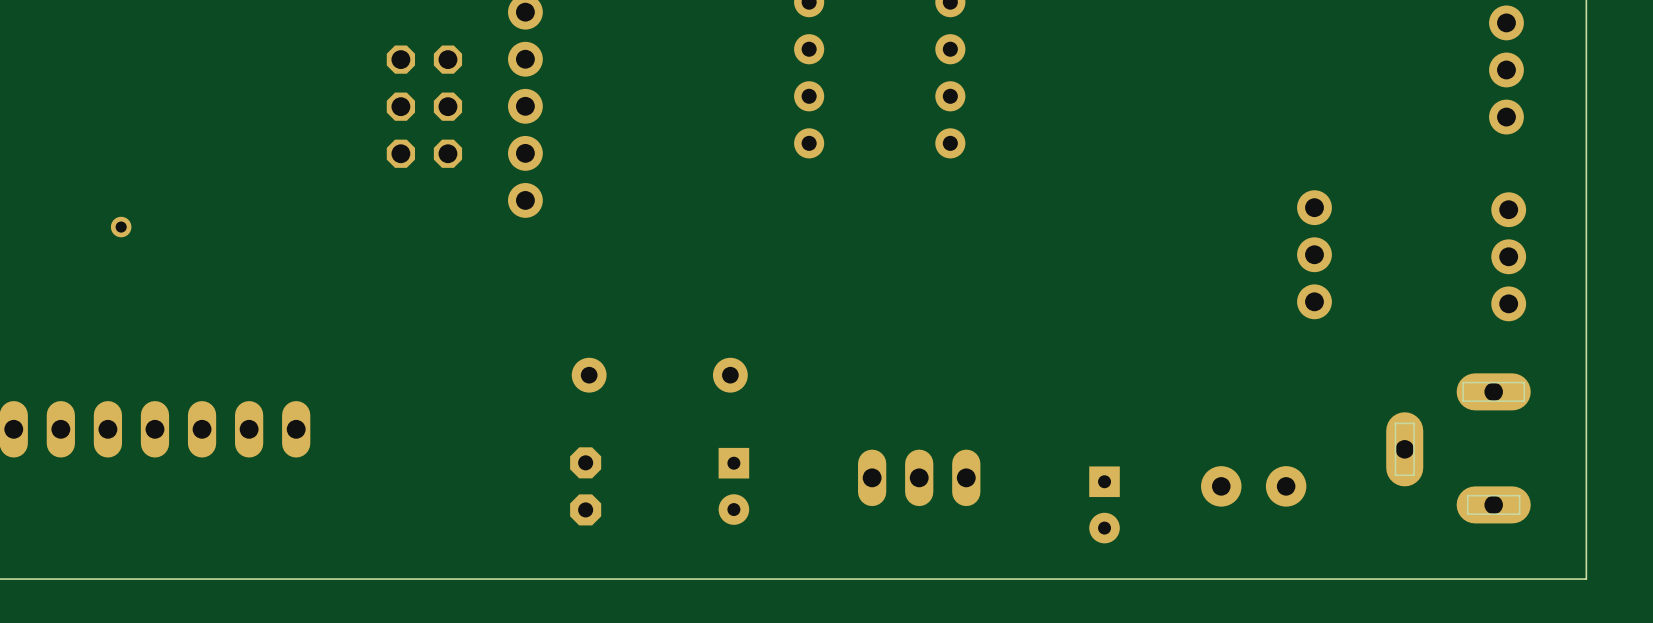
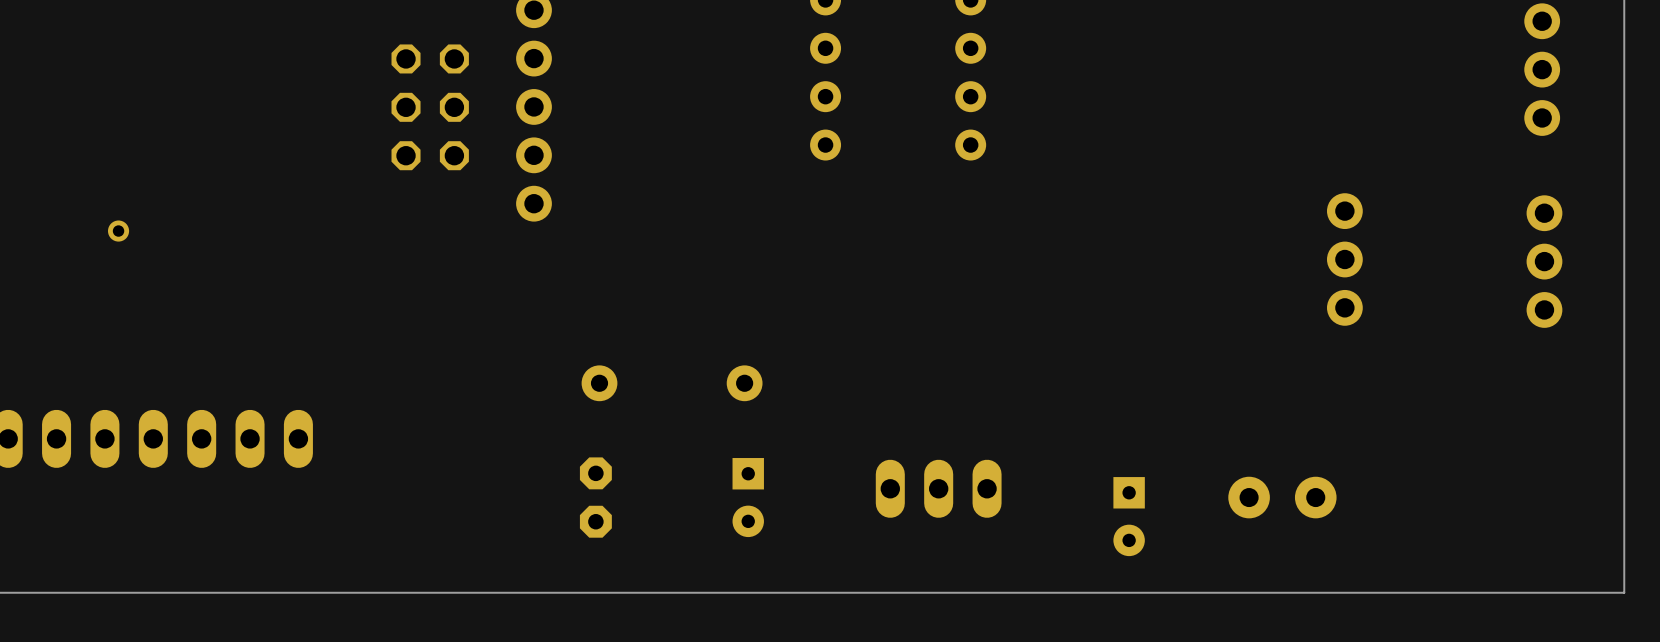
part: (1458, 448) -> none

